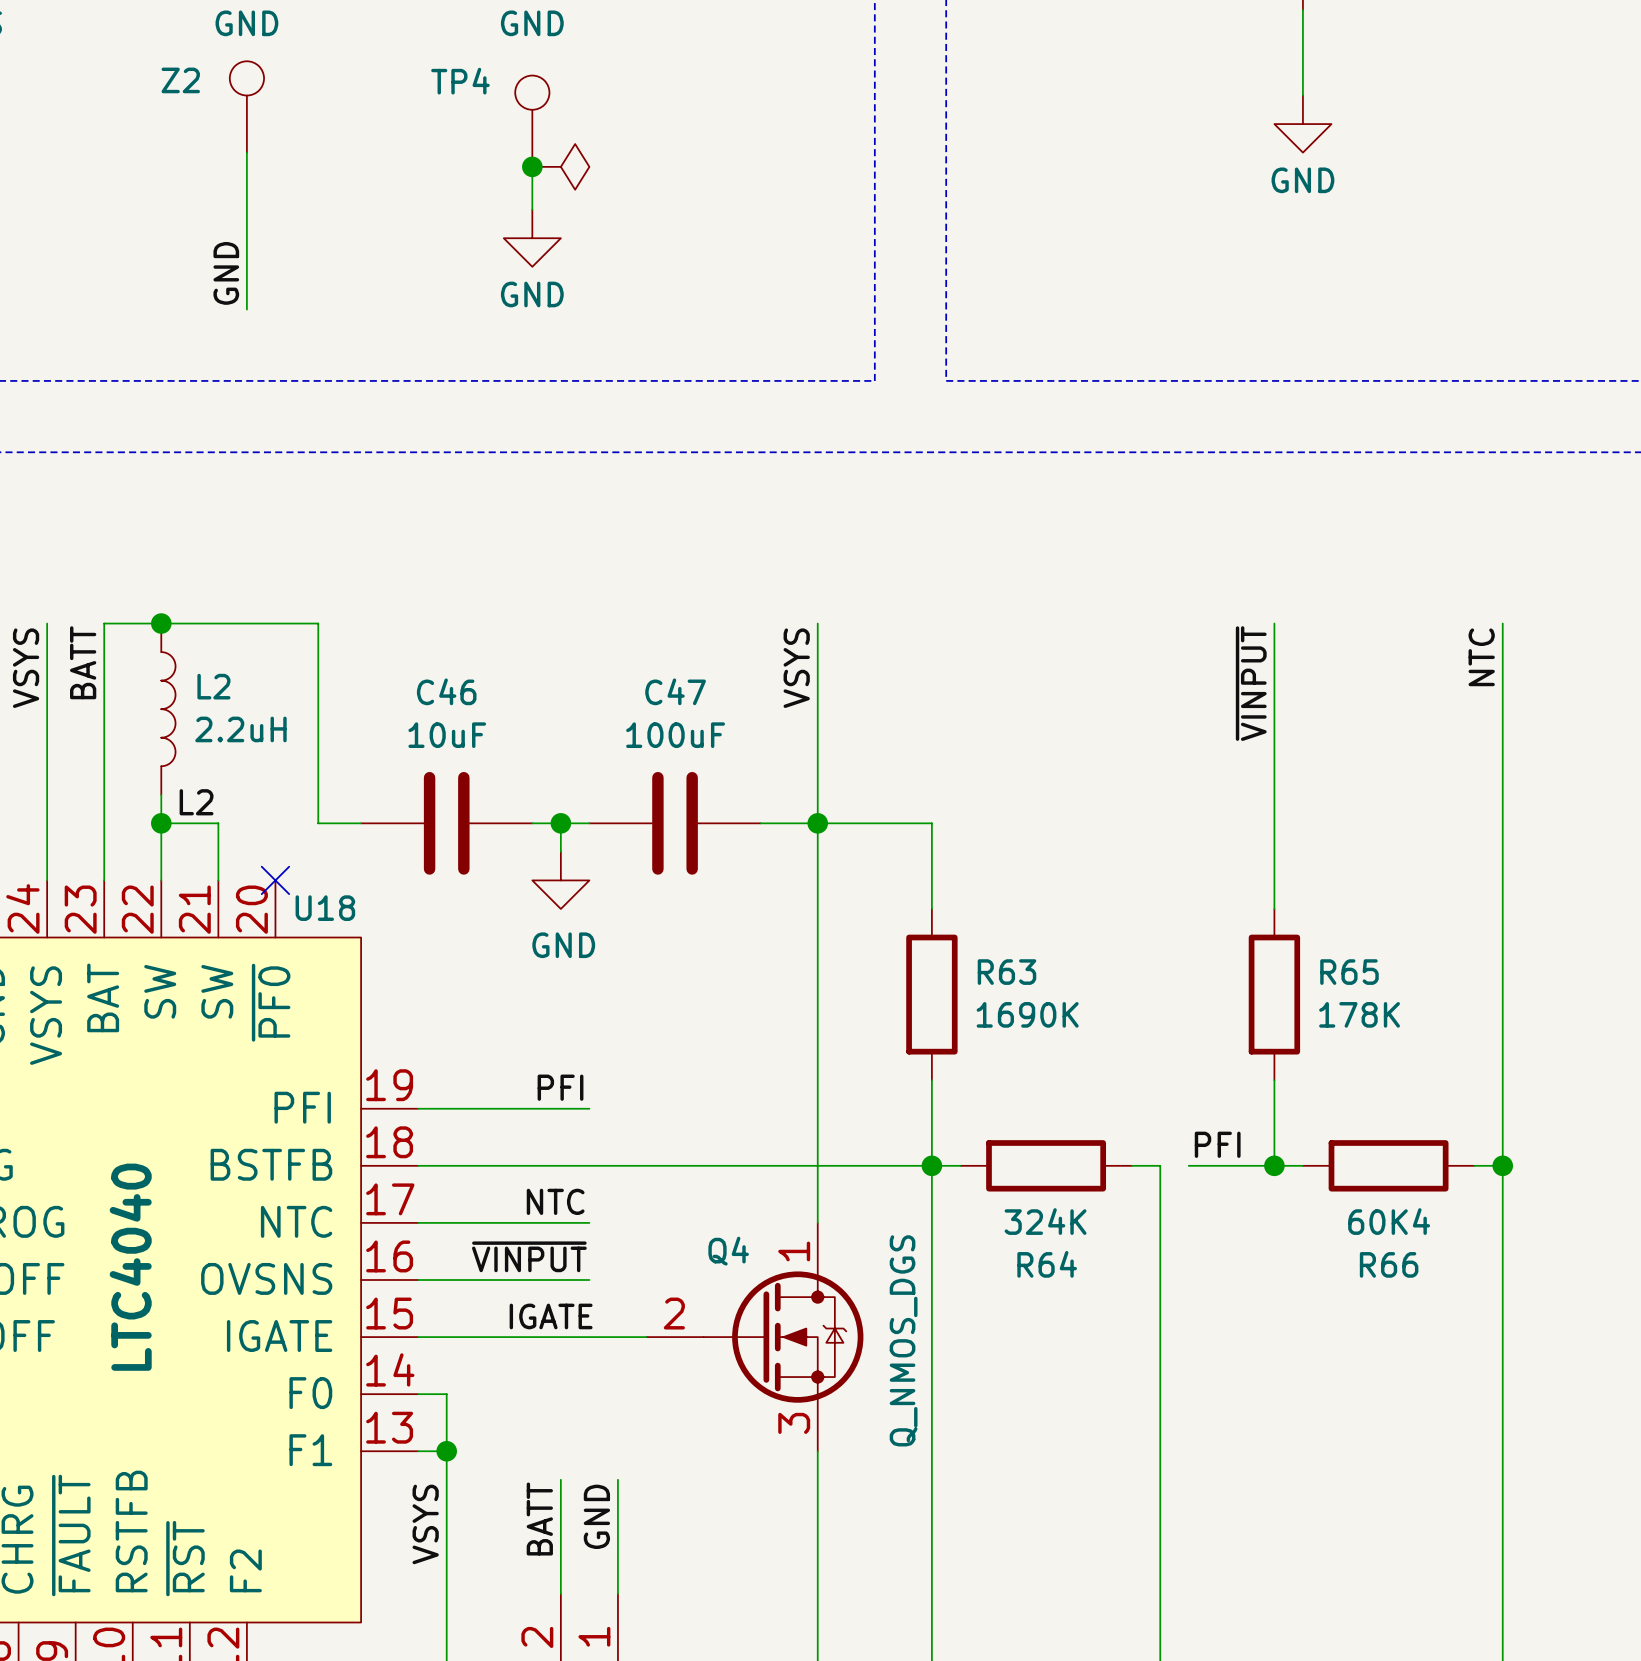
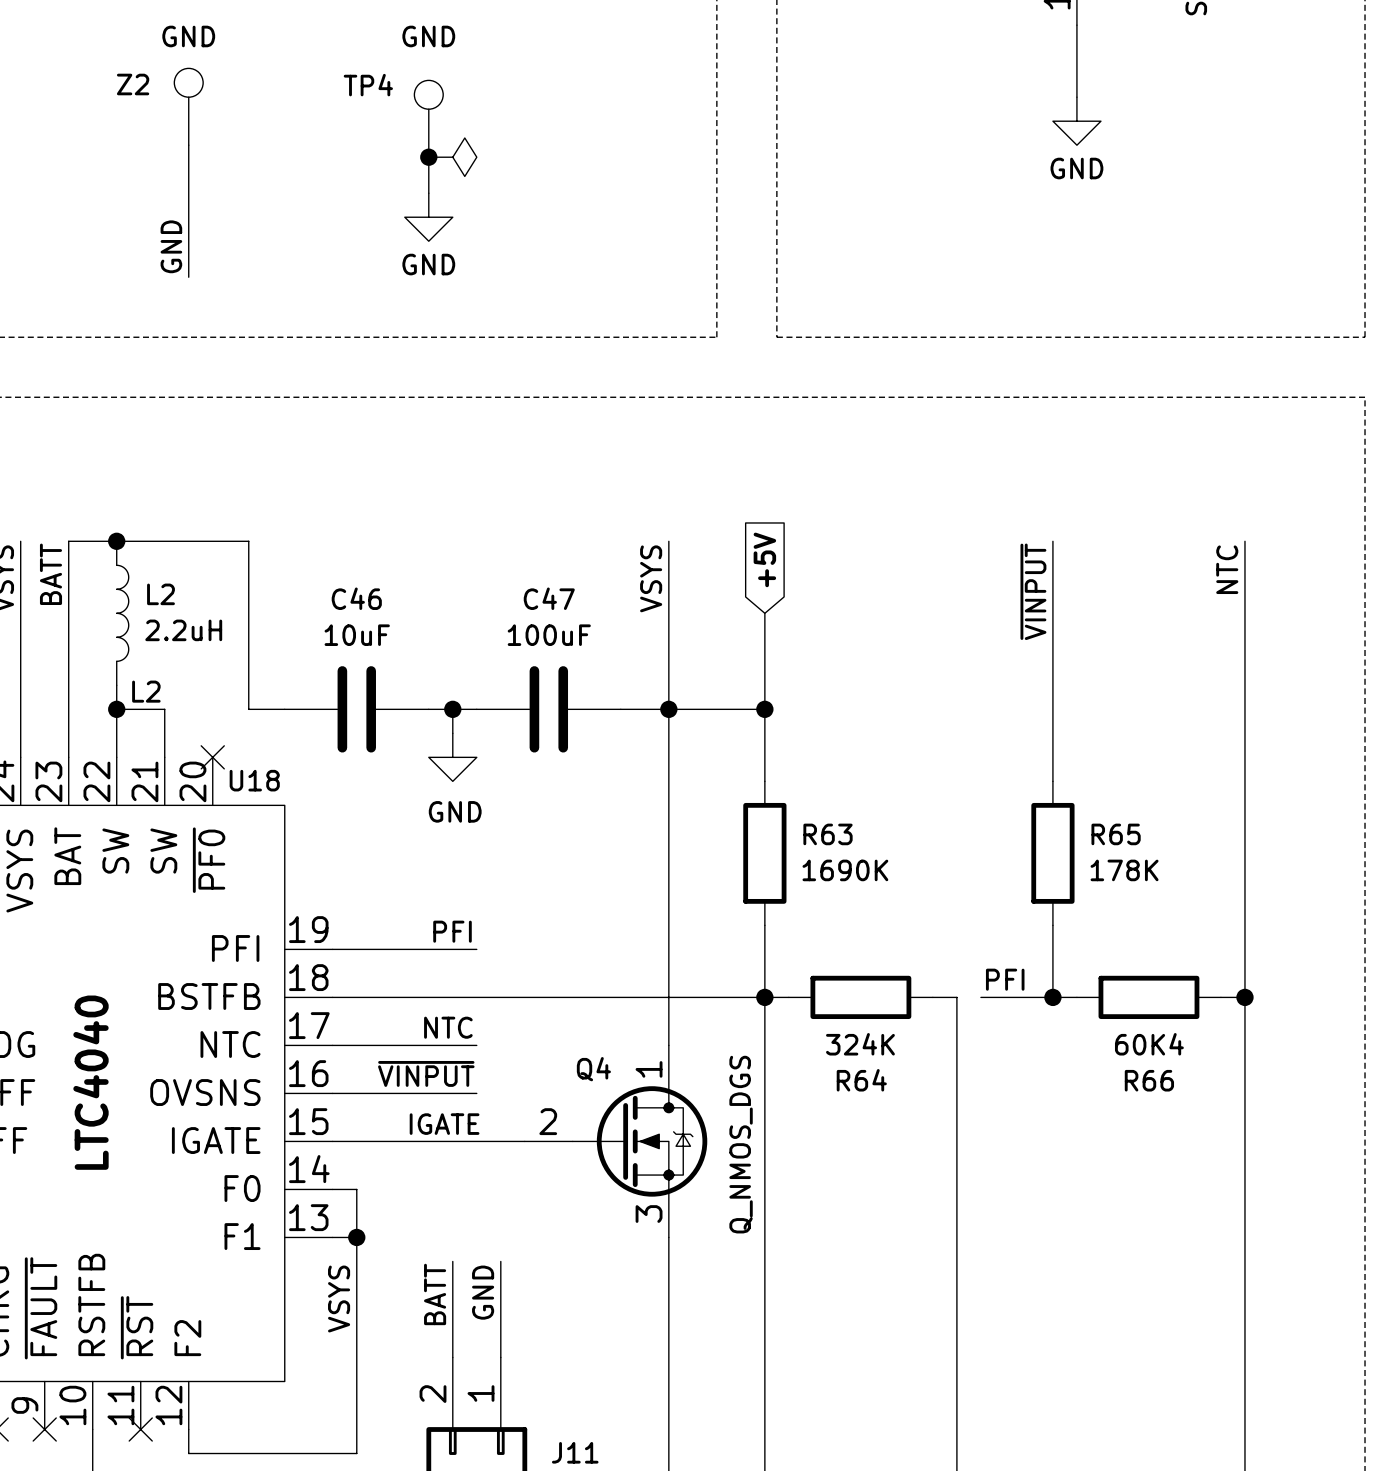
global label: none -> +5V (764, 559)
wire: none -> (764, 613) (764, 709)
junction: none -> (764, 709)

